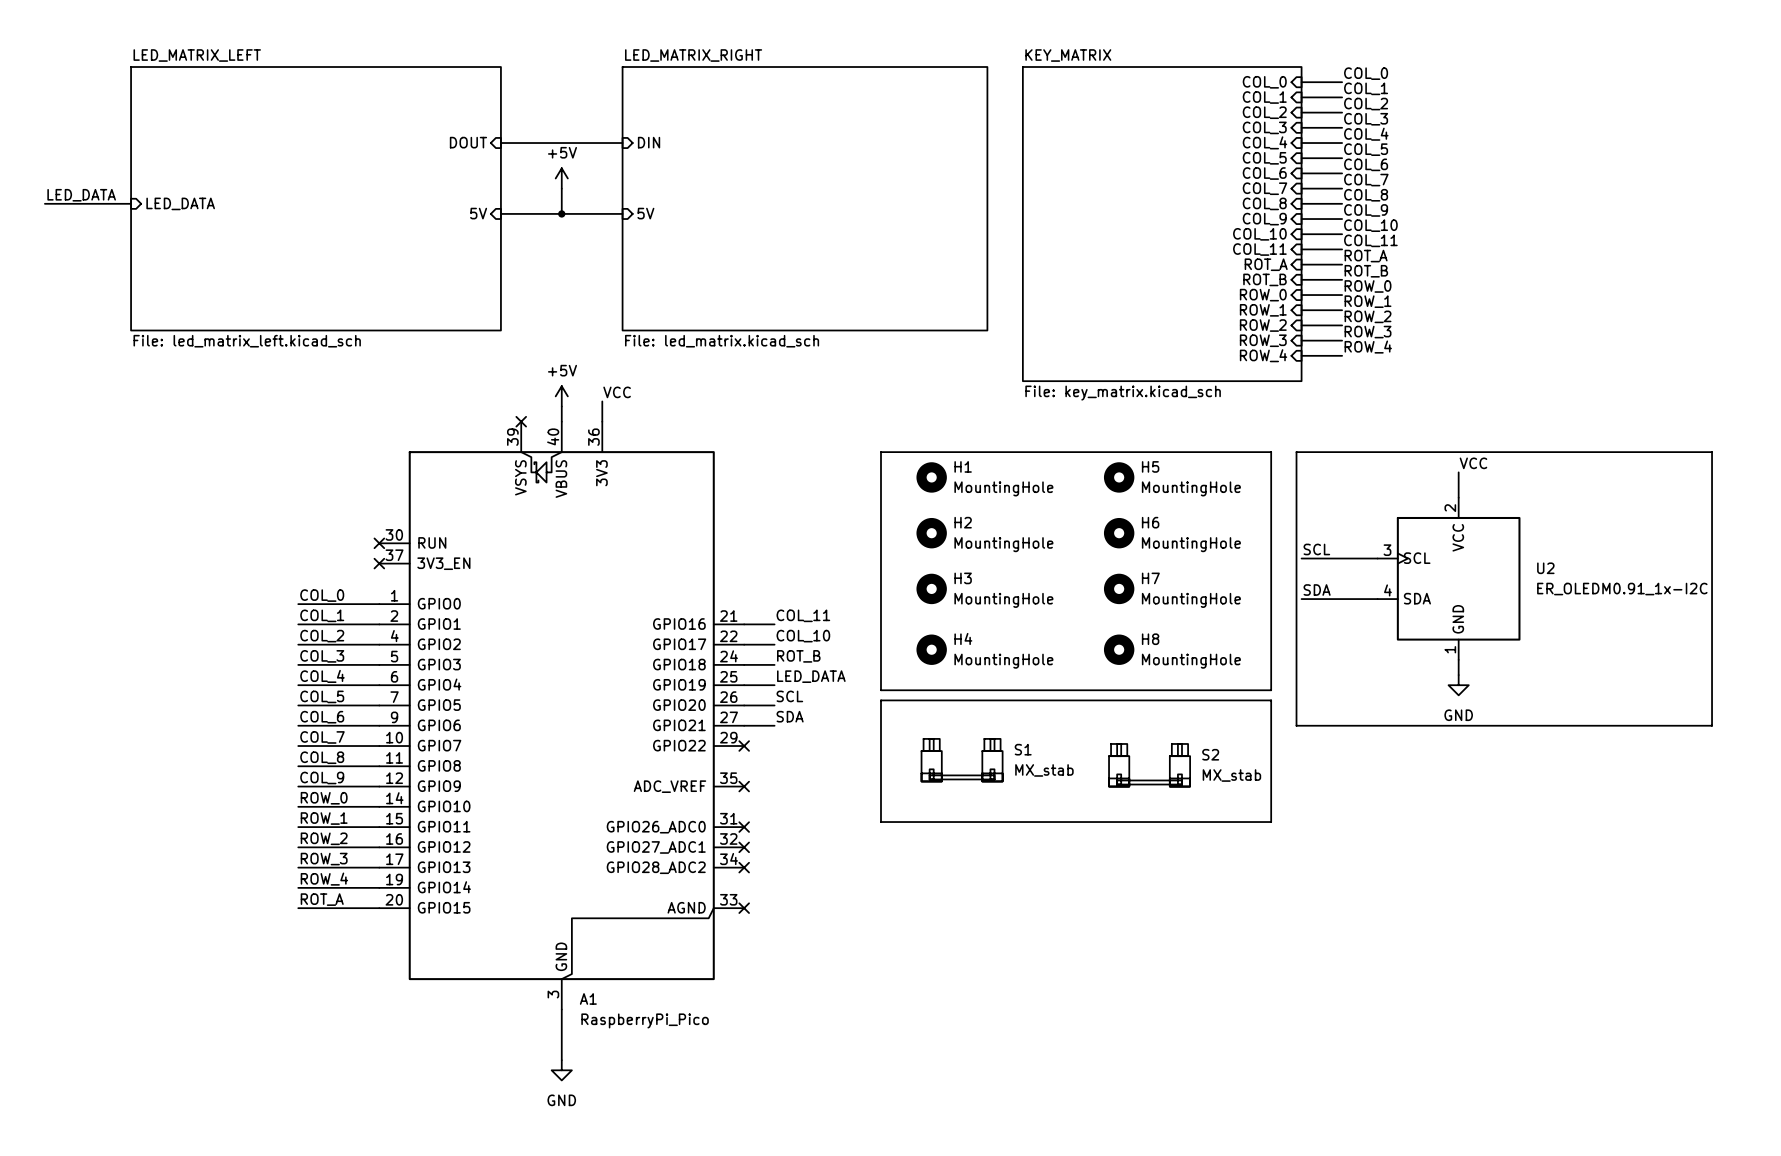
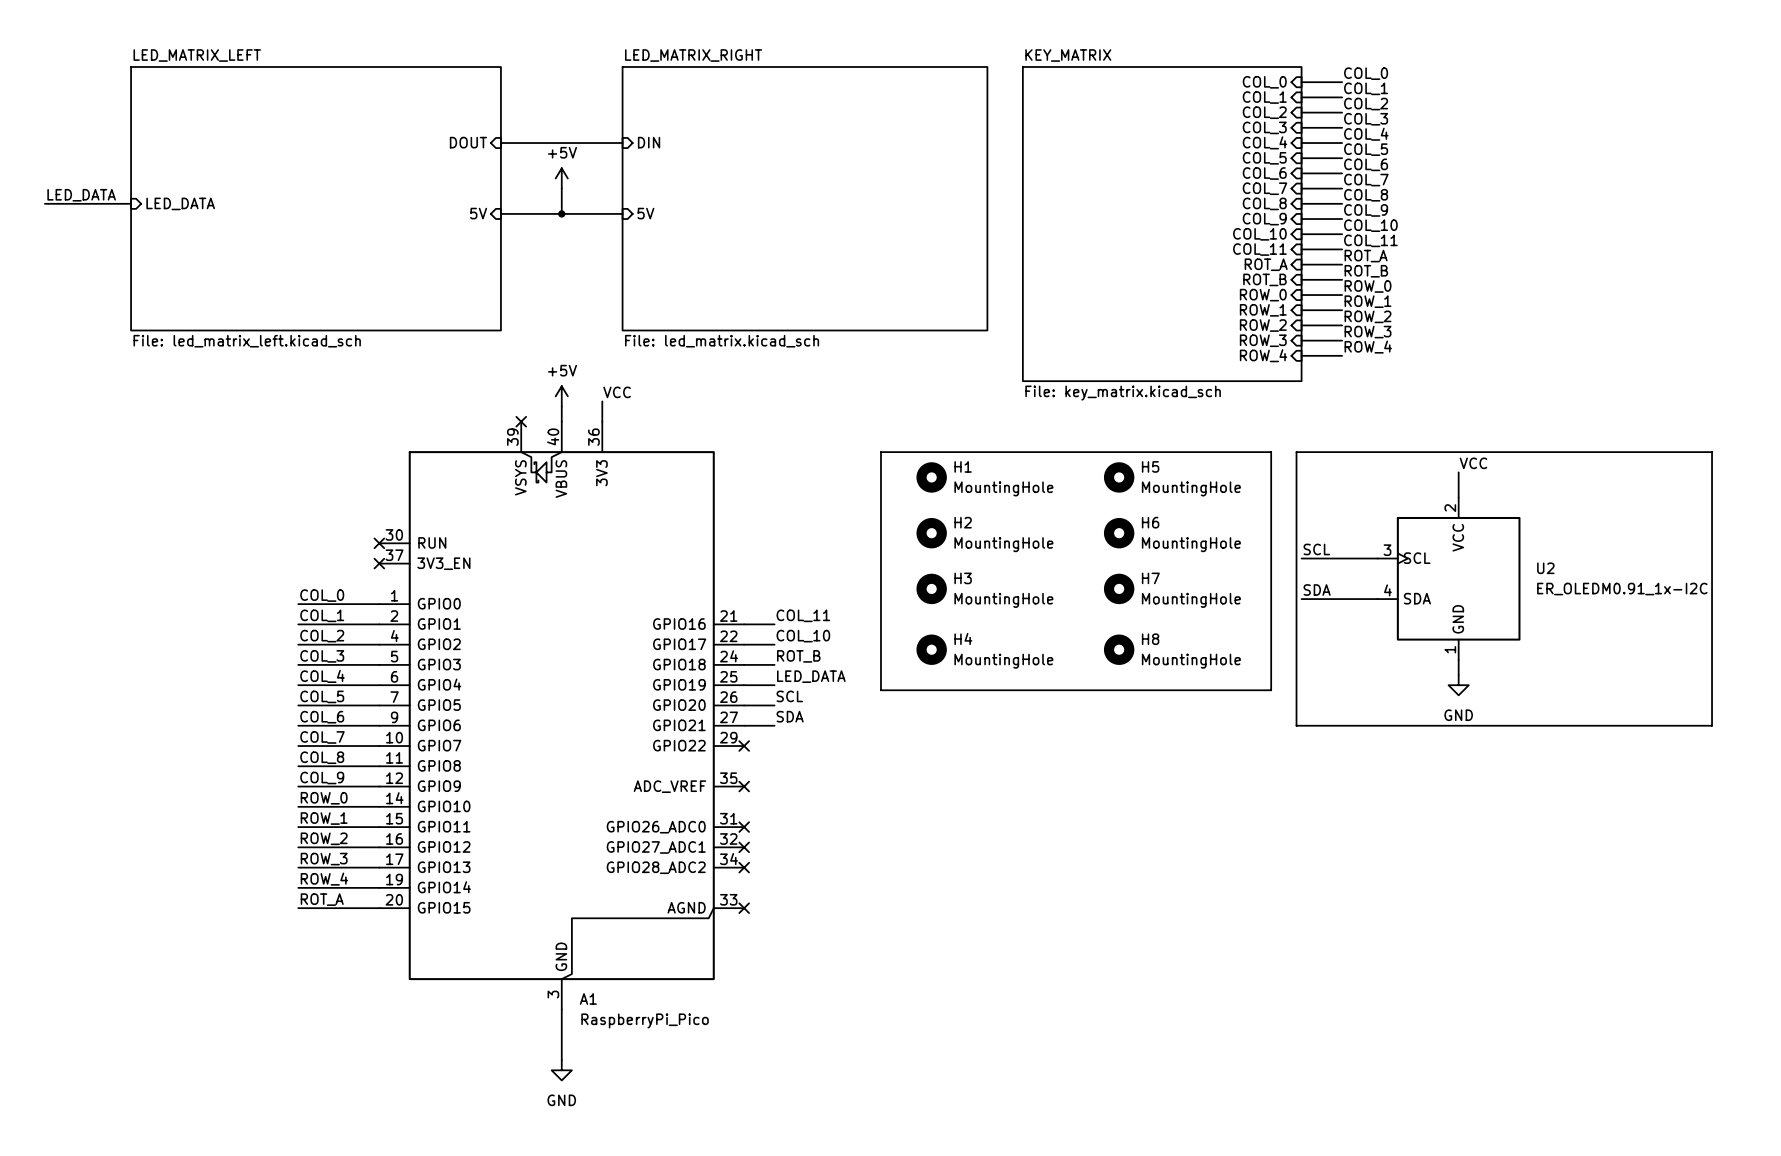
line: (881, 700) (1271, 700) (1271, 822) (881, 822) (881, 700) -> none
S1: MX_stab (962, 760) -> none
S2: MX_stab (1149, 765) -> none

